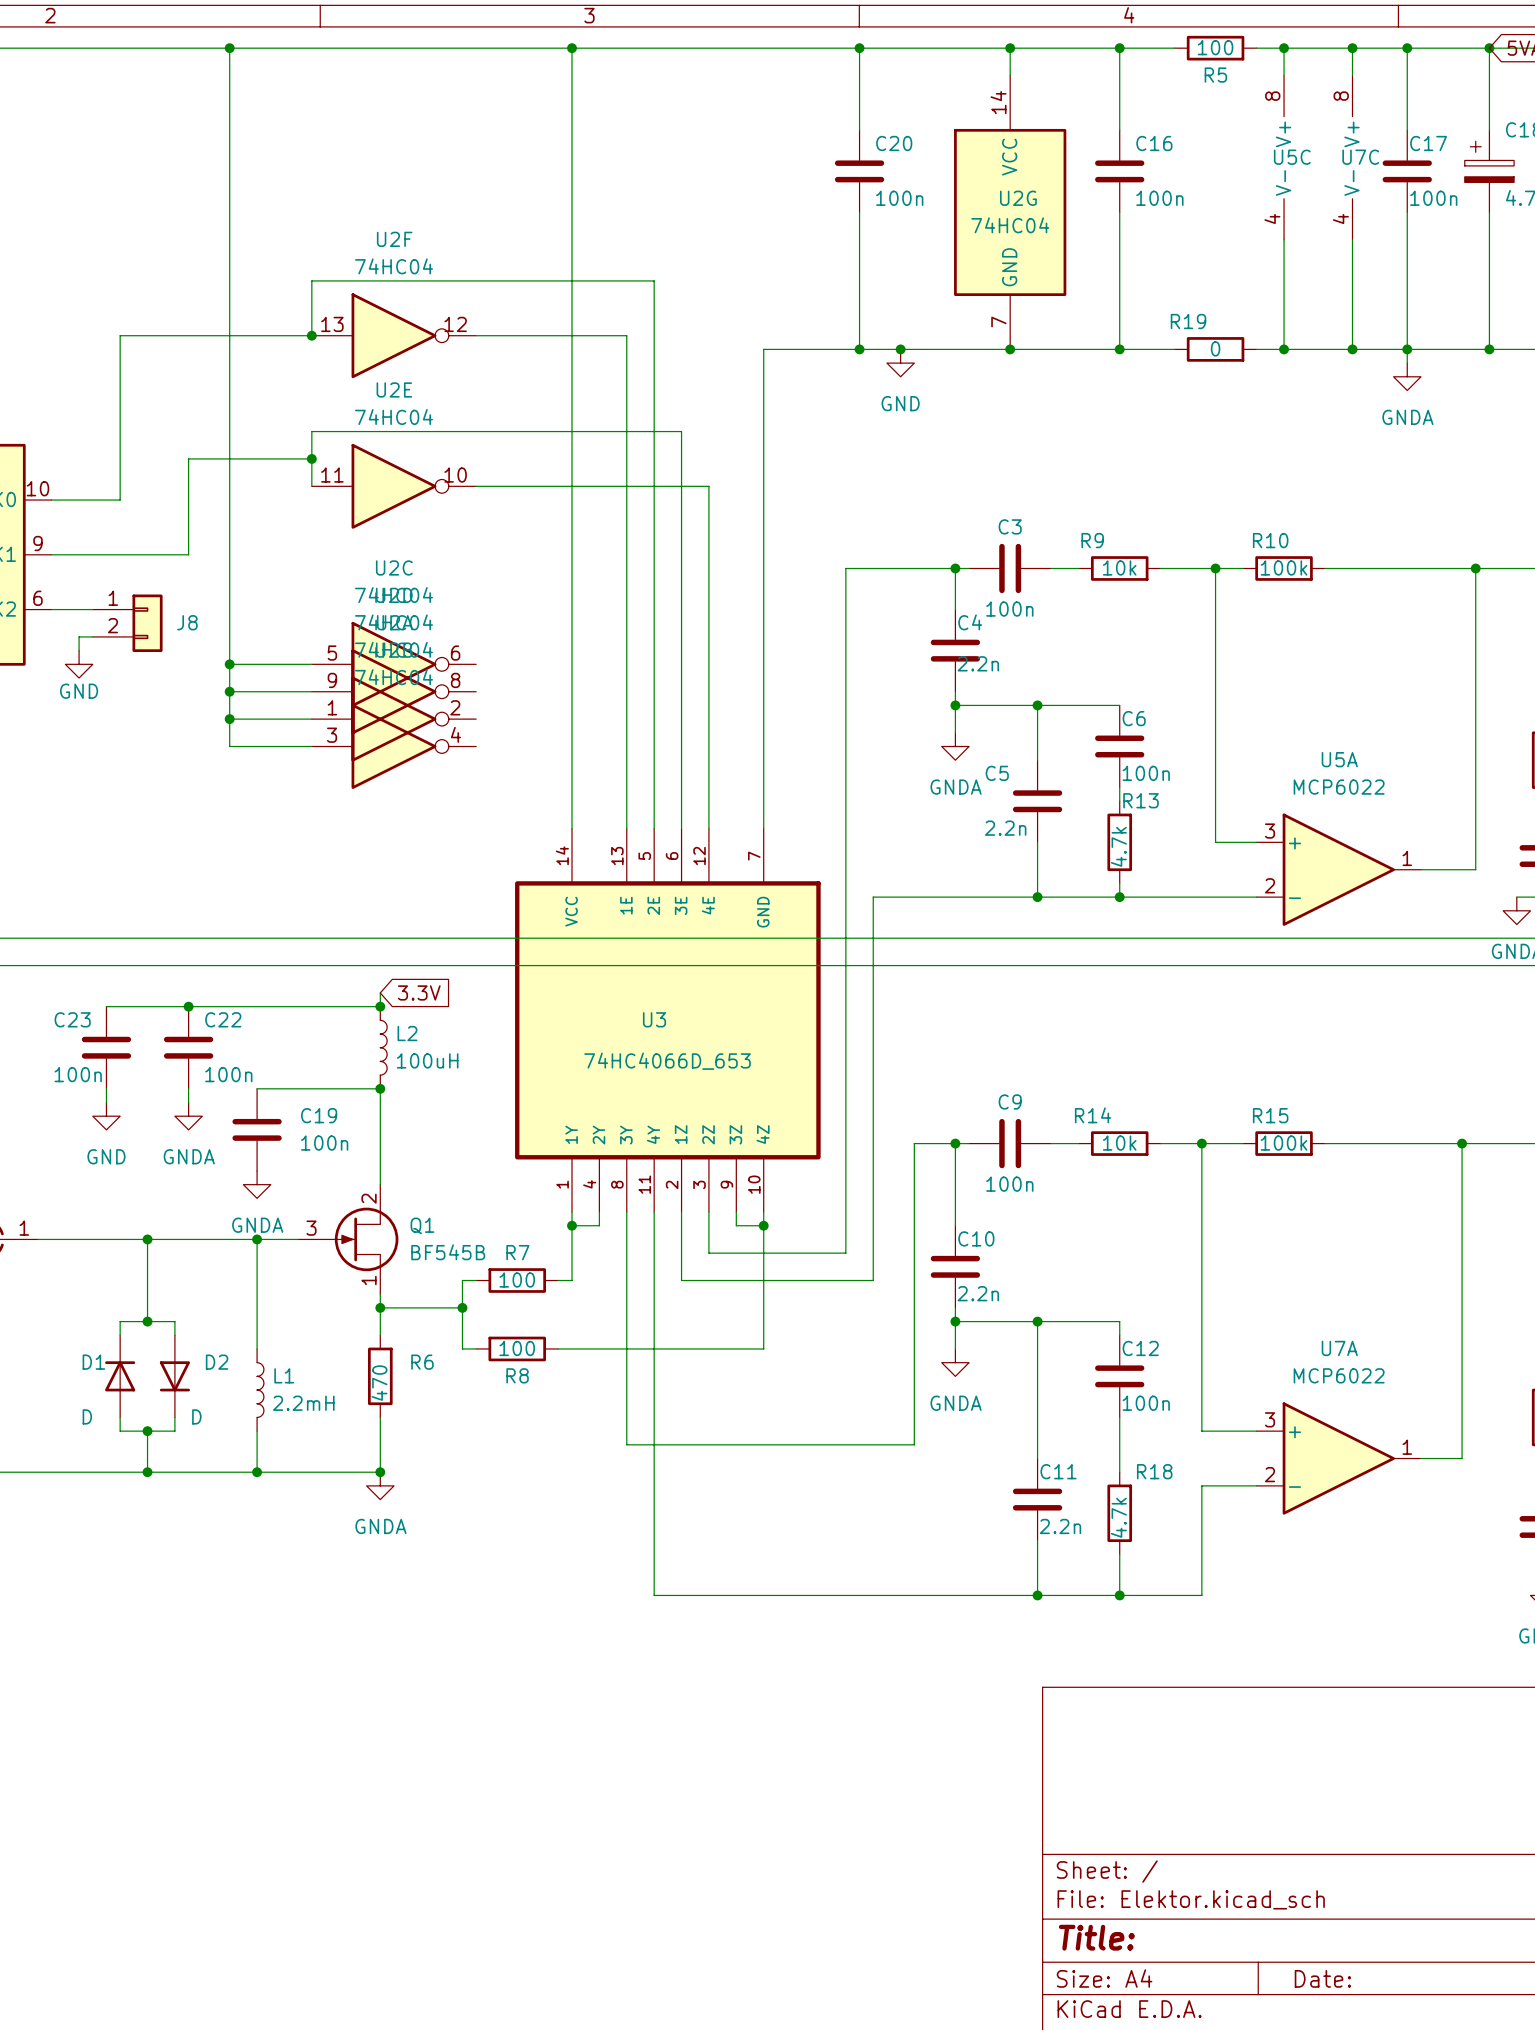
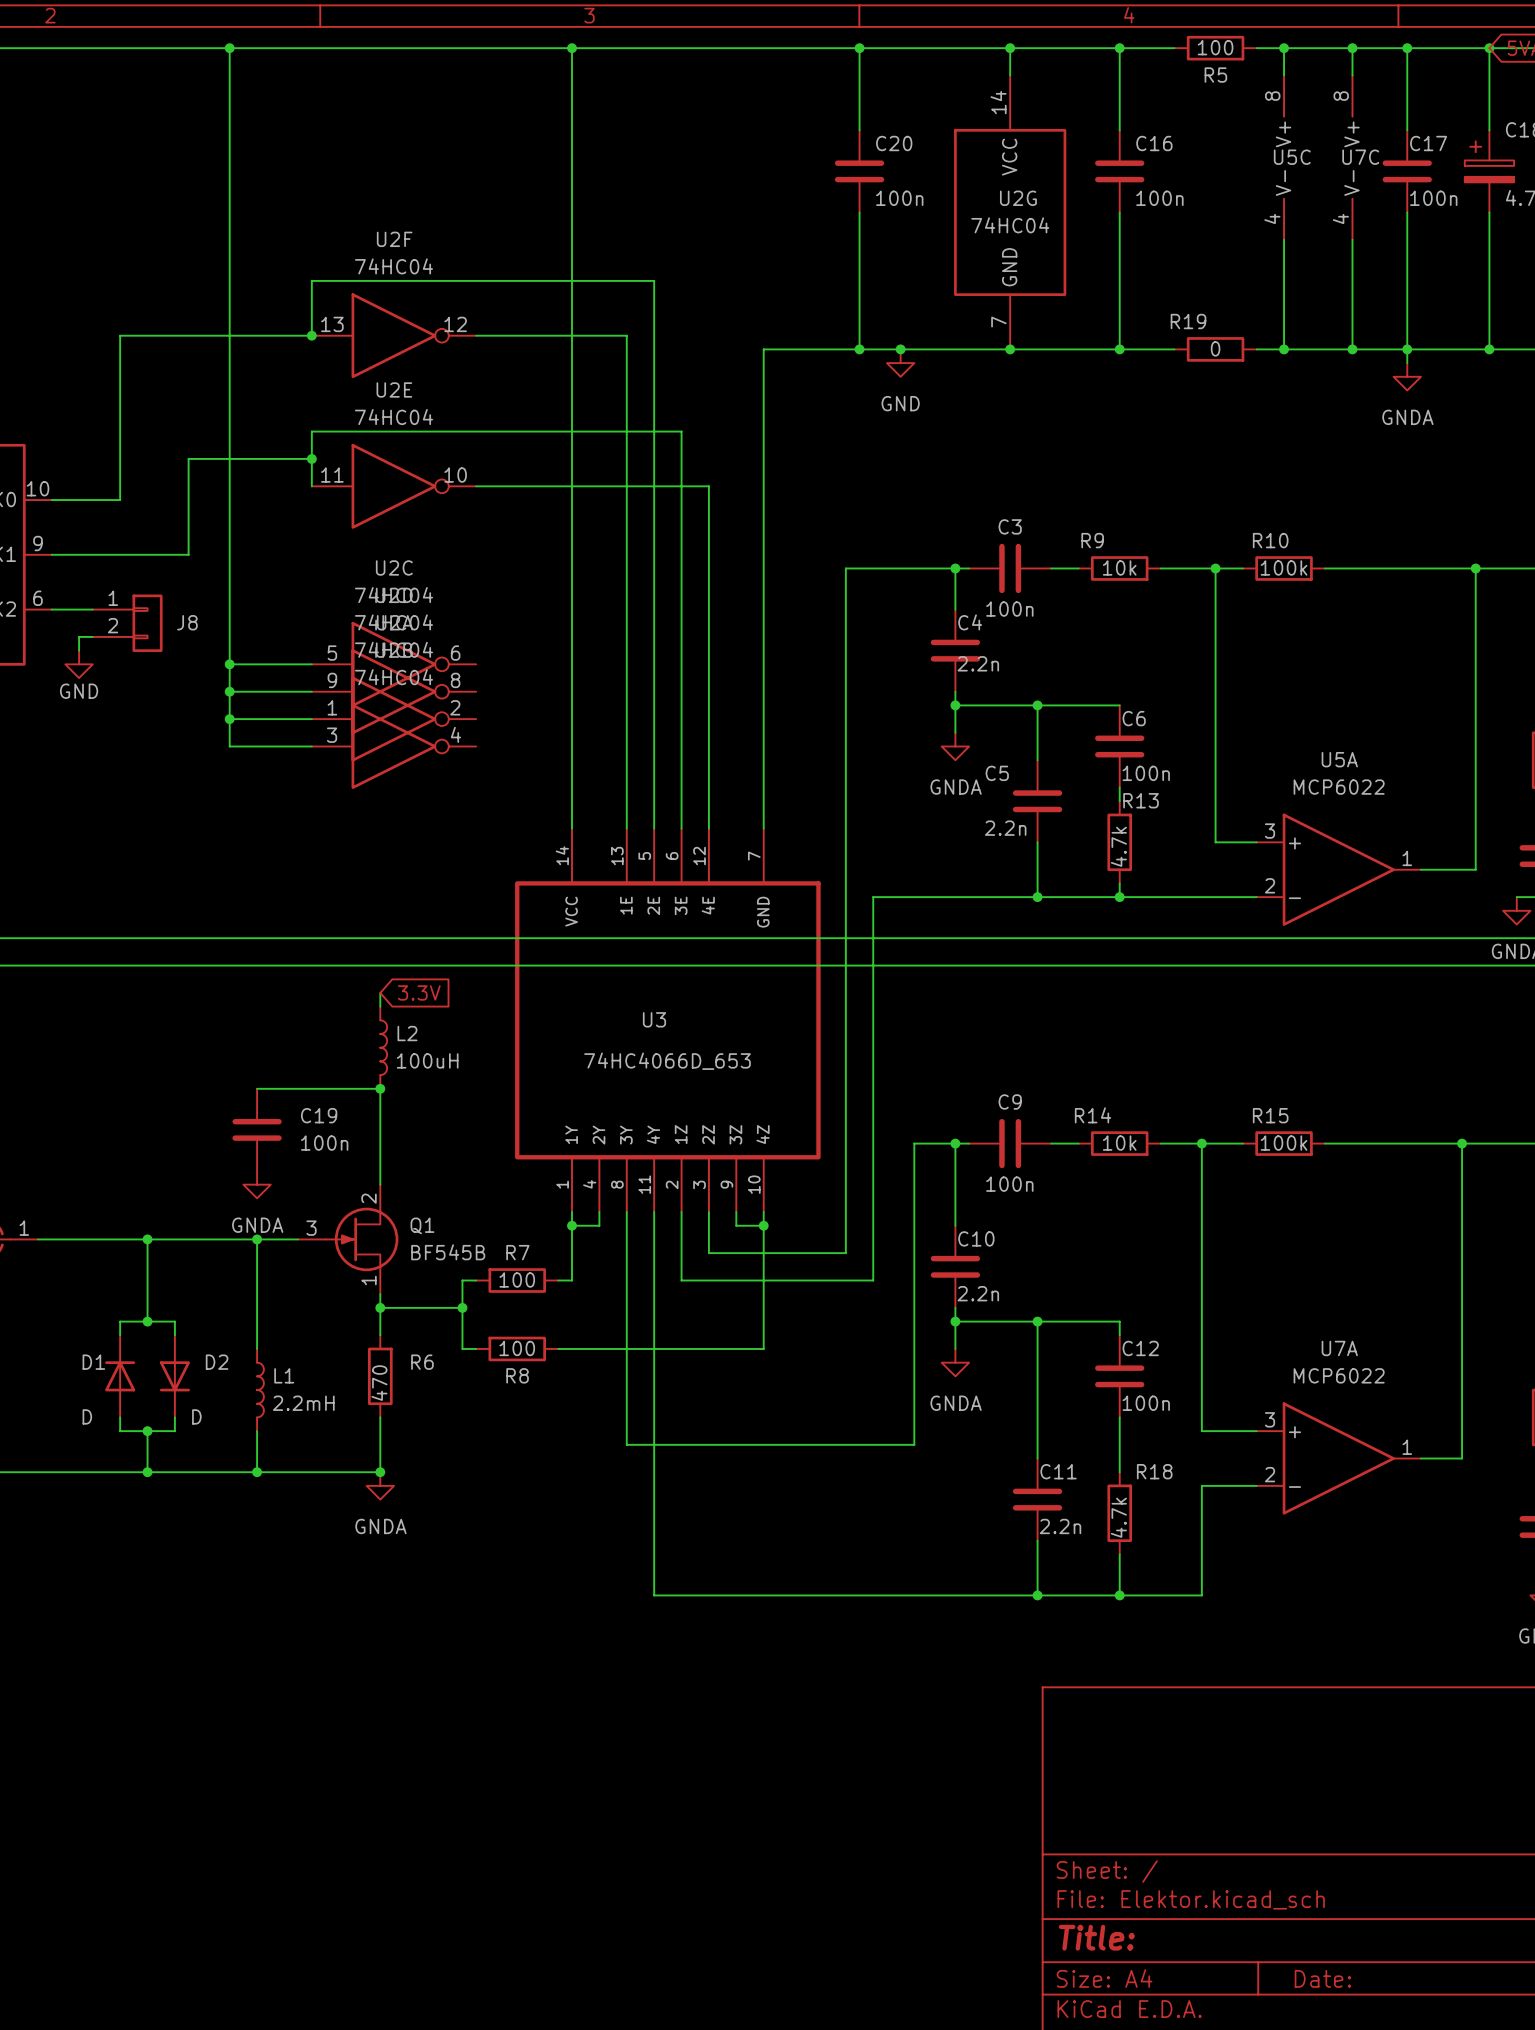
wire: (106, 1006) (380, 1006) -> none
junction: (188, 1006) -> none
junction: (380, 1006) -> none
C23: 100n (106, 1047) -> none
C22: 100n (188, 1047) -> none
wire: (106, 1088) (106, 1102) -> none
wire: (188, 1088) (188, 1102) -> none
power symbol: GND (106, 1116) -> none
power symbol: GNDA (188, 1116) -> none

